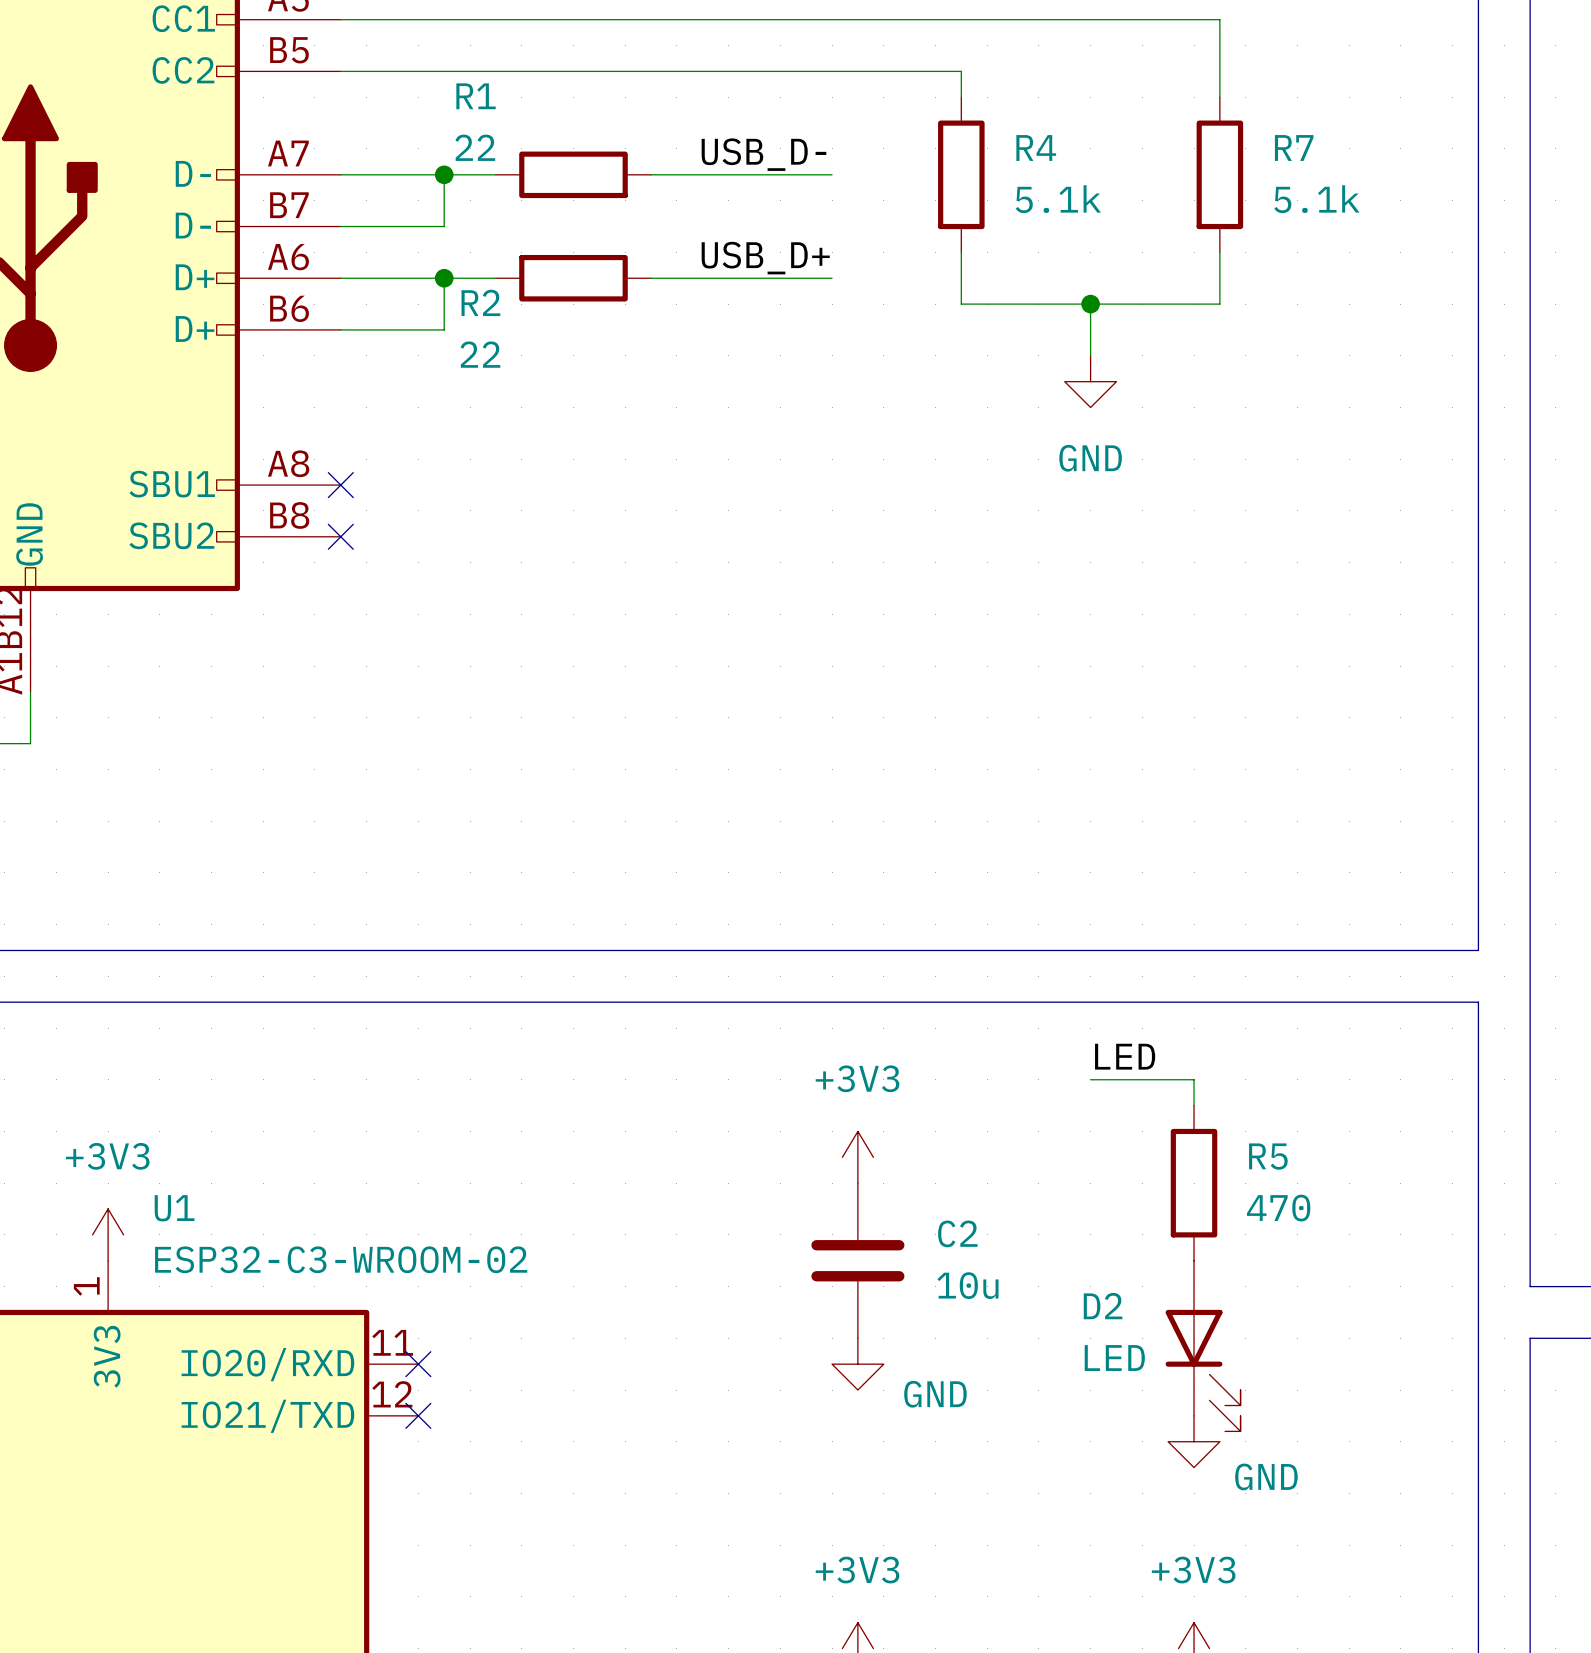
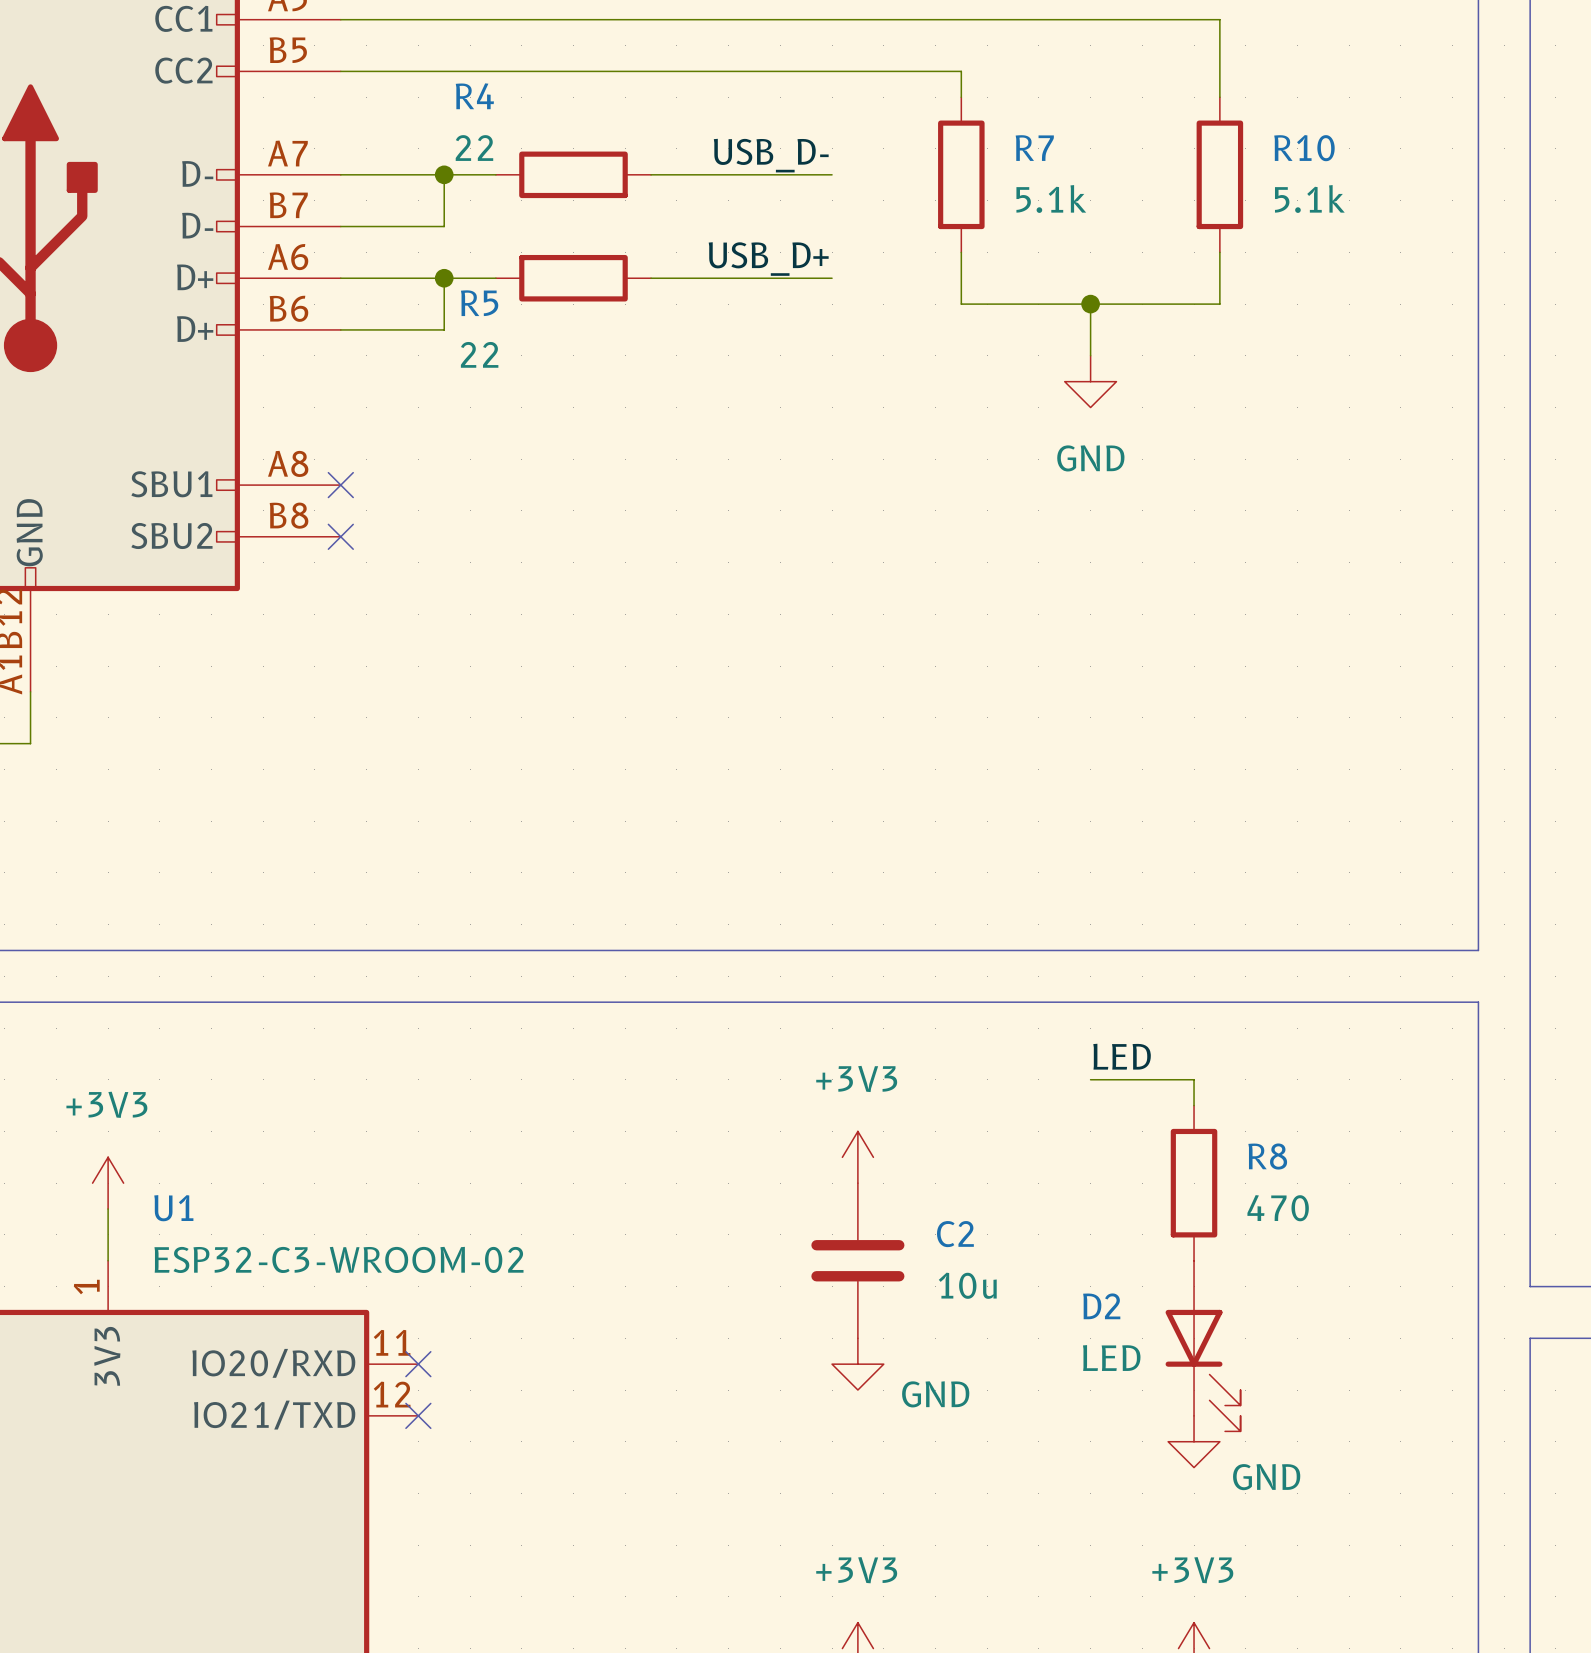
R1 name: R1 (476, 96) -> R4 (474, 96)
R4 name: R4 (1036, 148) -> R7 (1034, 148)
R7 name: R7 (1294, 148) -> R10 (1304, 148)
R2 name: R2 (480, 302) -> R5 (479, 303)
R5 name: R5 (1268, 1156) -> R8 (1267, 1156)
power symbol position: +3V3 (108, 1234) -> +3V3 (108, 1183)

